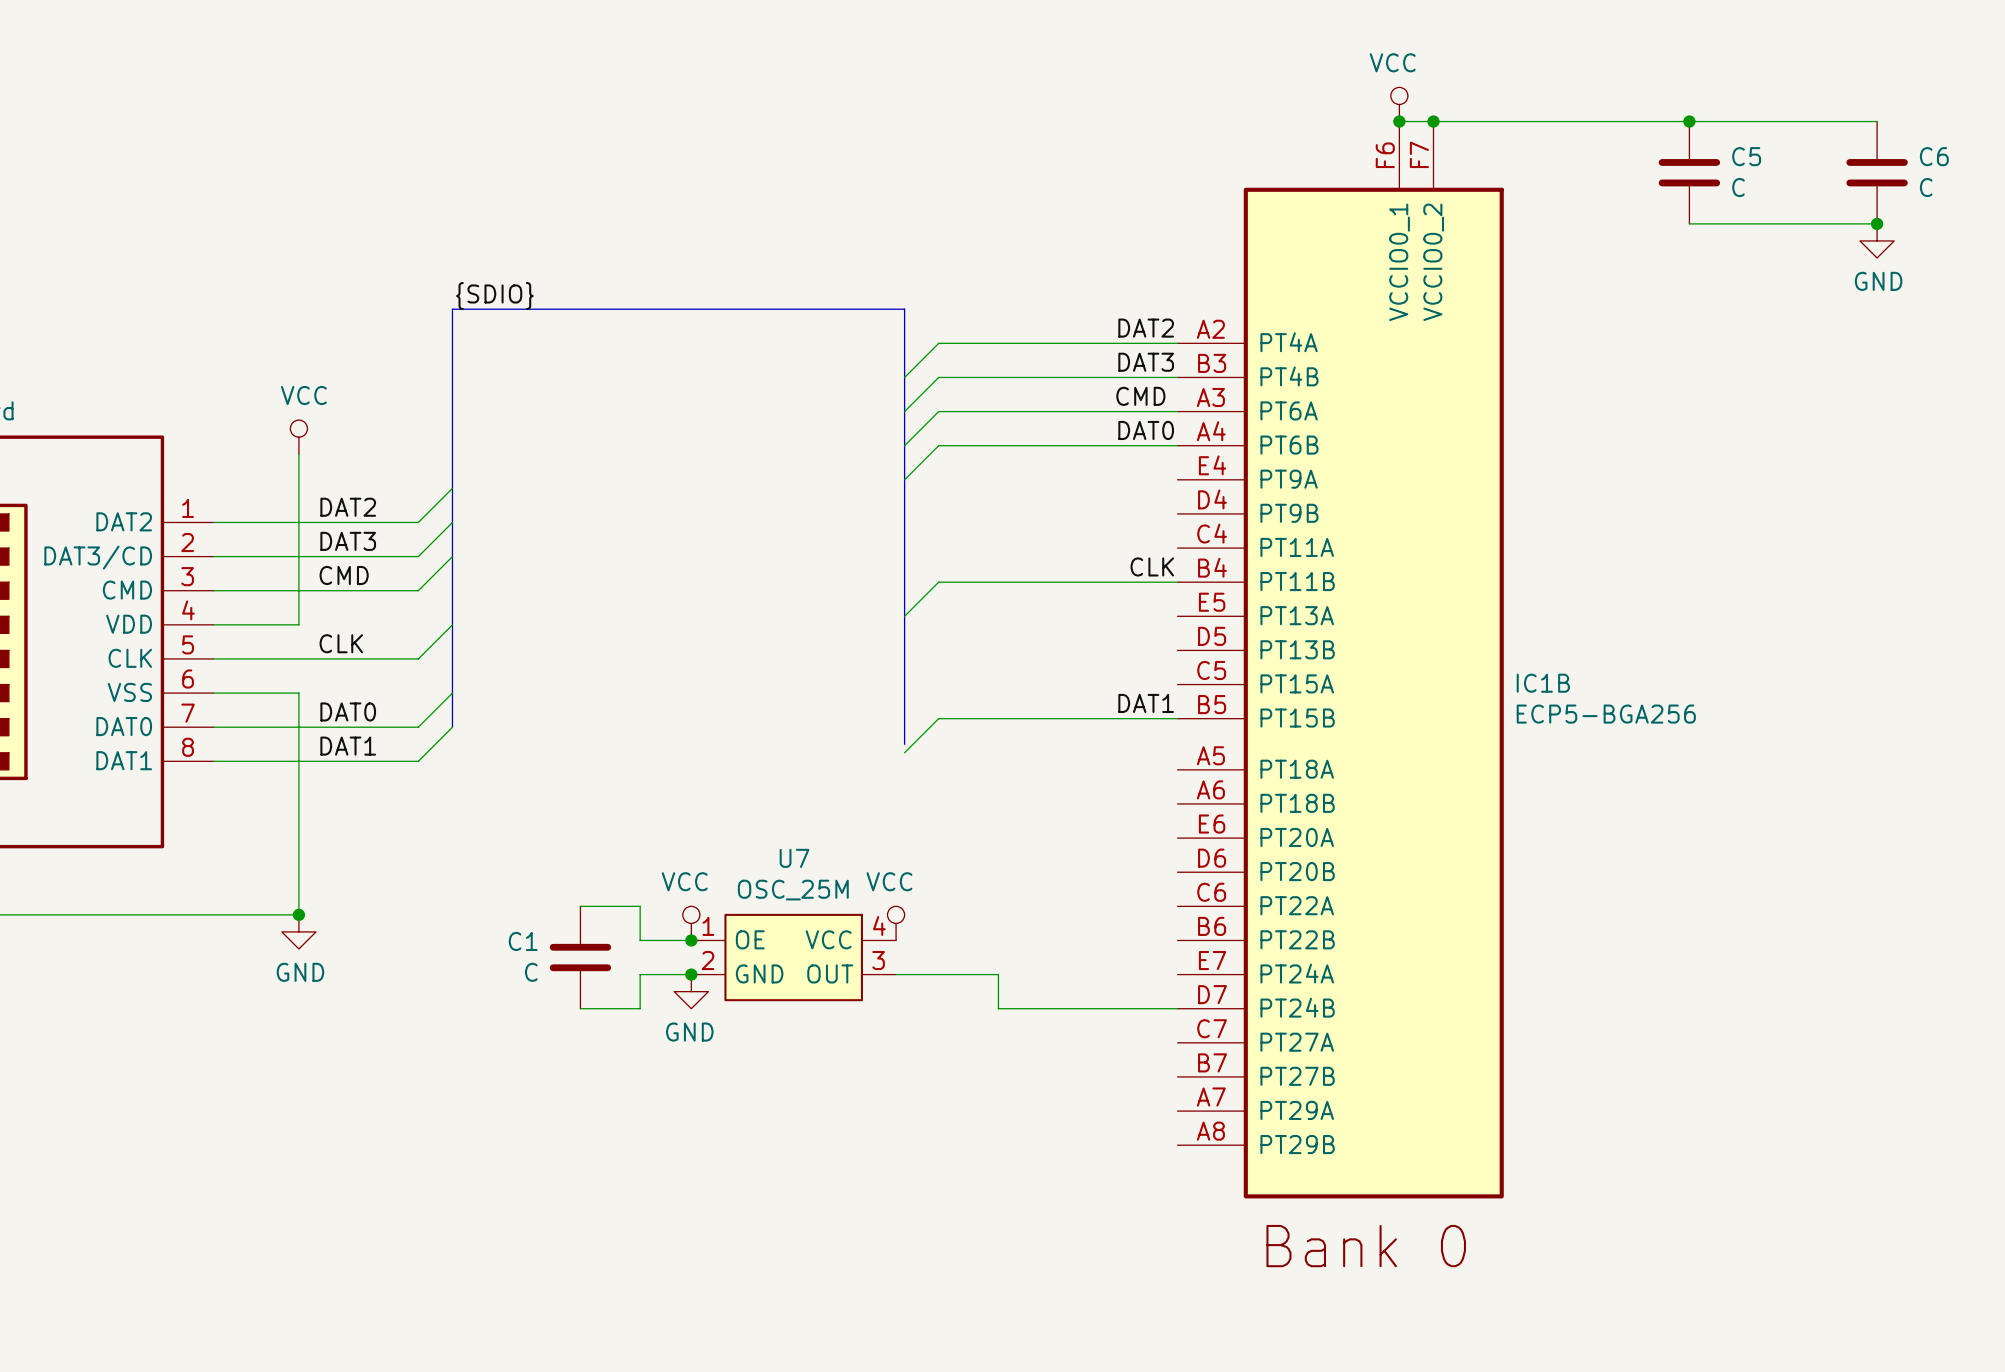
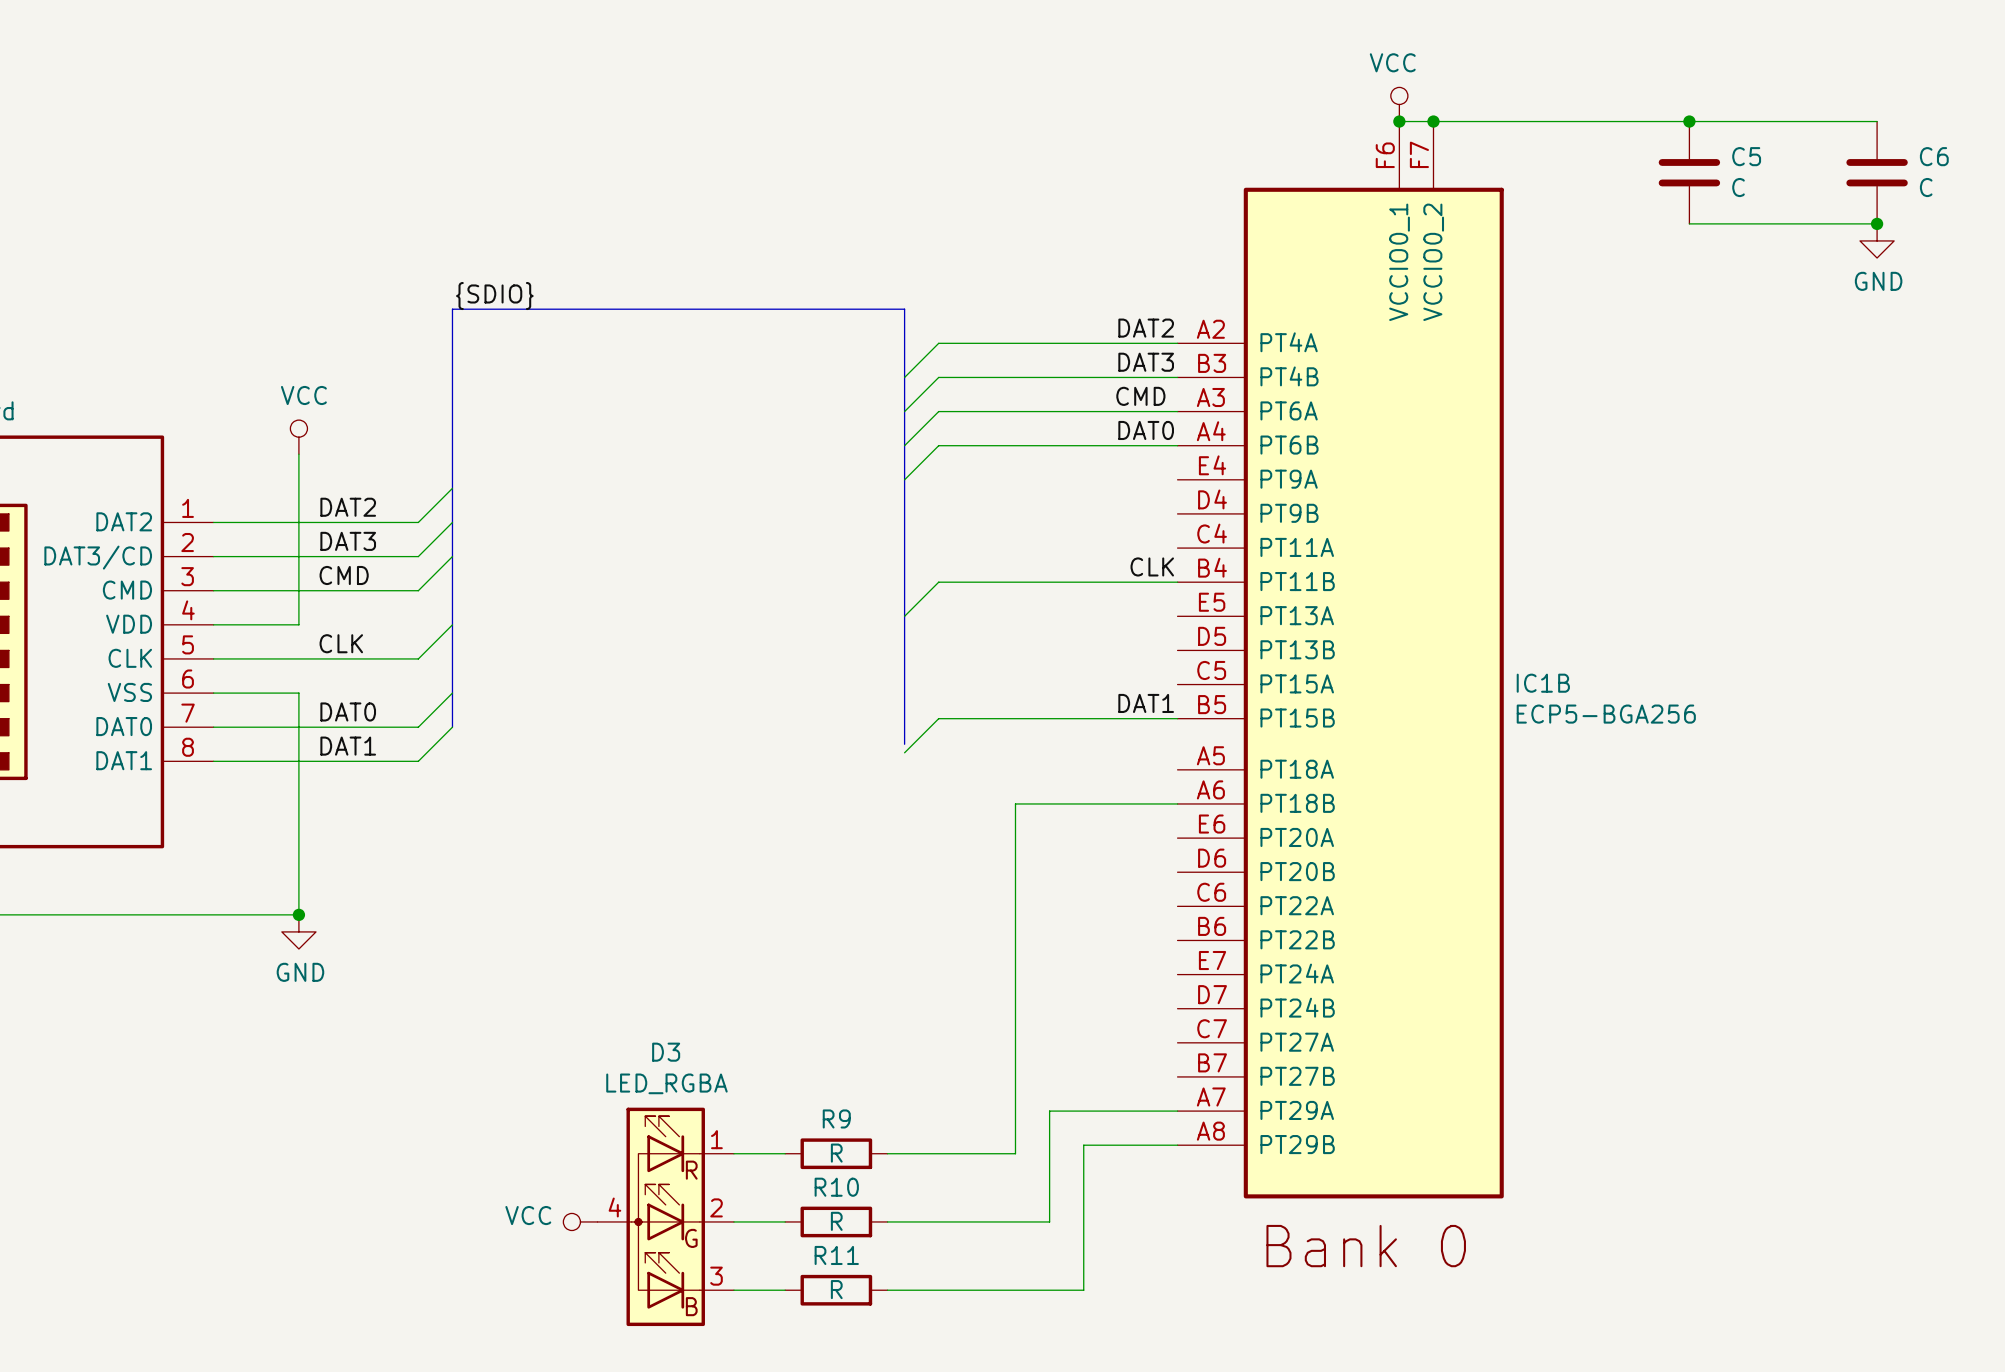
wire: none -> (1177, 803) (1015, 803) (1015, 1153) (887, 1153)
wire: (580, 906) (640, 906) (640, 940) (691, 940) -> none
power symbol: VCC (691, 923) -> none
power symbol: VCC (896, 923) -> none
junction: (691, 940) -> none
C1: C (580, 957) -> none
U7: OSC_25M (793, 957) -> none
wire: (691, 974) (640, 974) (640, 1008) (580, 1008) -> none
junction: (691, 974) -> none
wire: (896, 974) (998, 974) (998, 1008) (1177, 1008) -> none
power symbol: GND (691, 991) -> none
wire: none -> (1177, 1111) (1049, 1111) (1049, 1221) (887, 1221)
wire: none -> (1177, 1145) (1083, 1145) (1083, 1290) (887, 1290)
wire: none -> (733, 1153) (785, 1153)
R9: none -> R (836, 1153)
D3: none -> LED_RGBA (665, 1216)
power symbol: none -> VCC (580, 1221)
wire: none -> (733, 1221) (785, 1221)
R10: none -> R (836, 1221)
wire: none -> (733, 1290) (785, 1290)
R11: none -> R (836, 1290)

